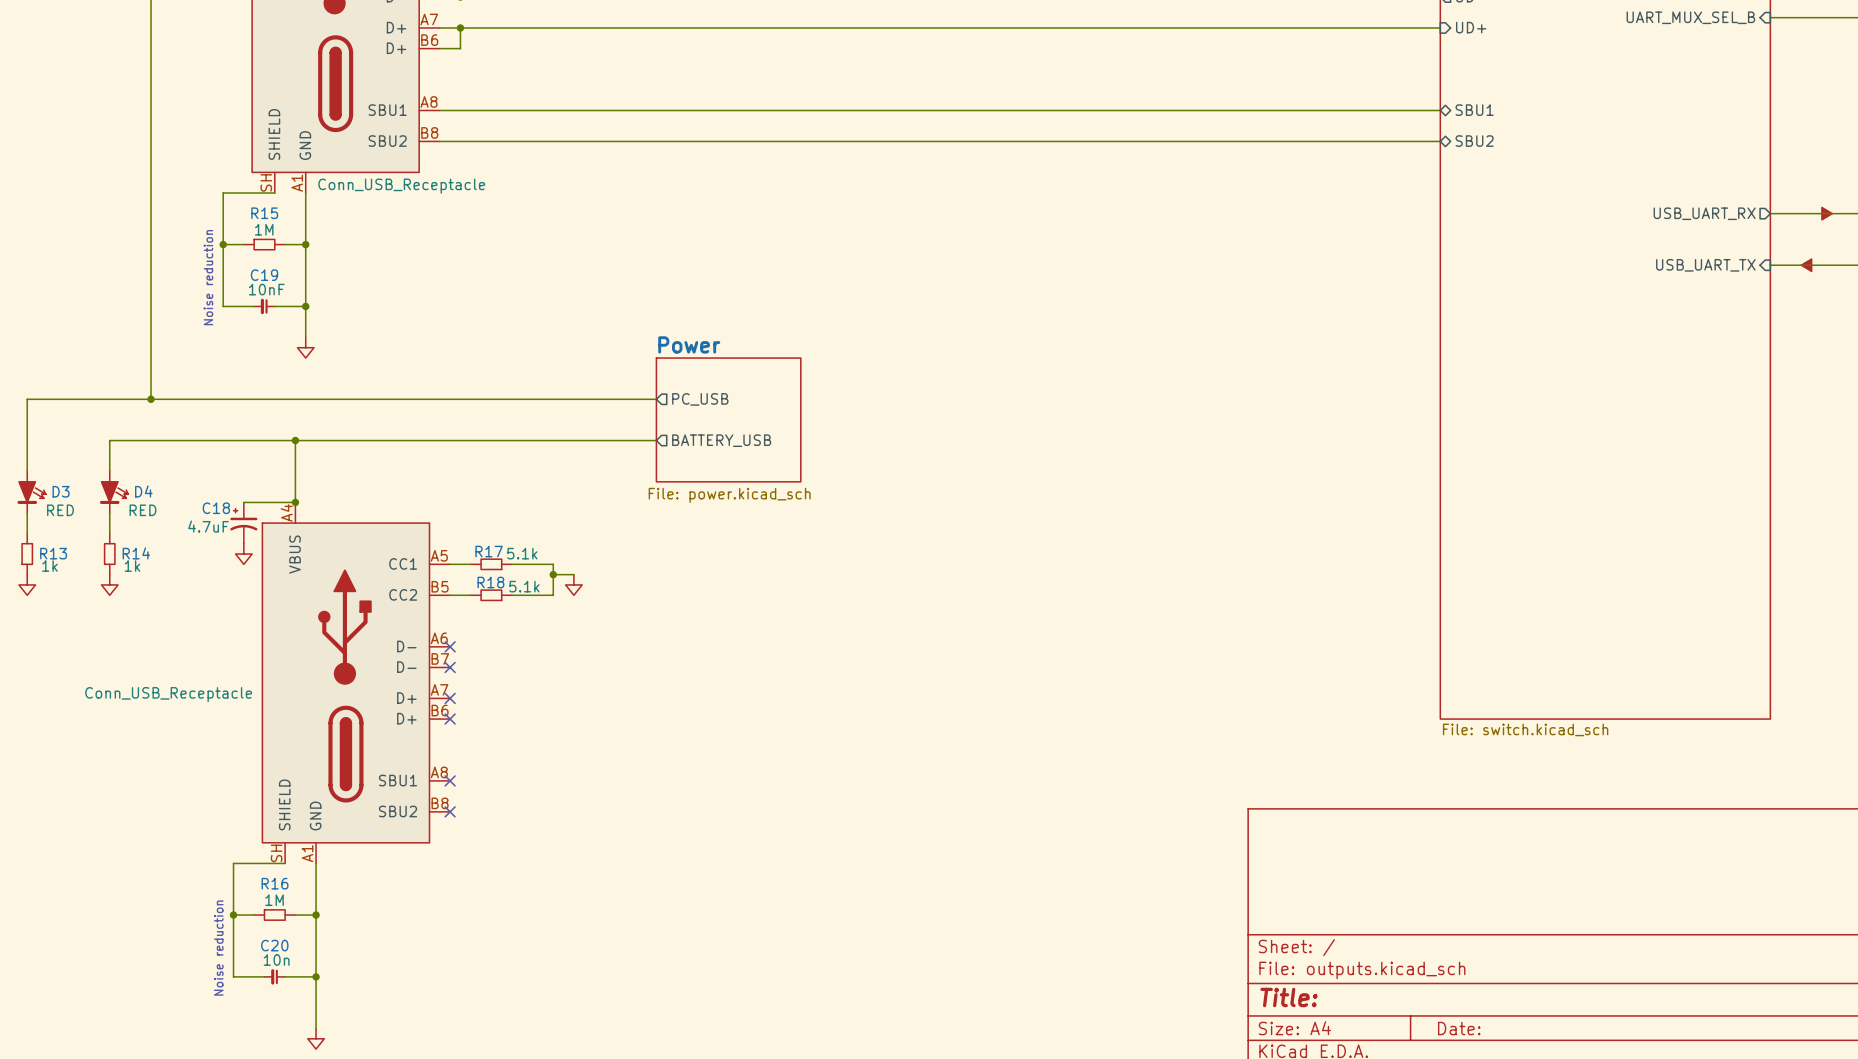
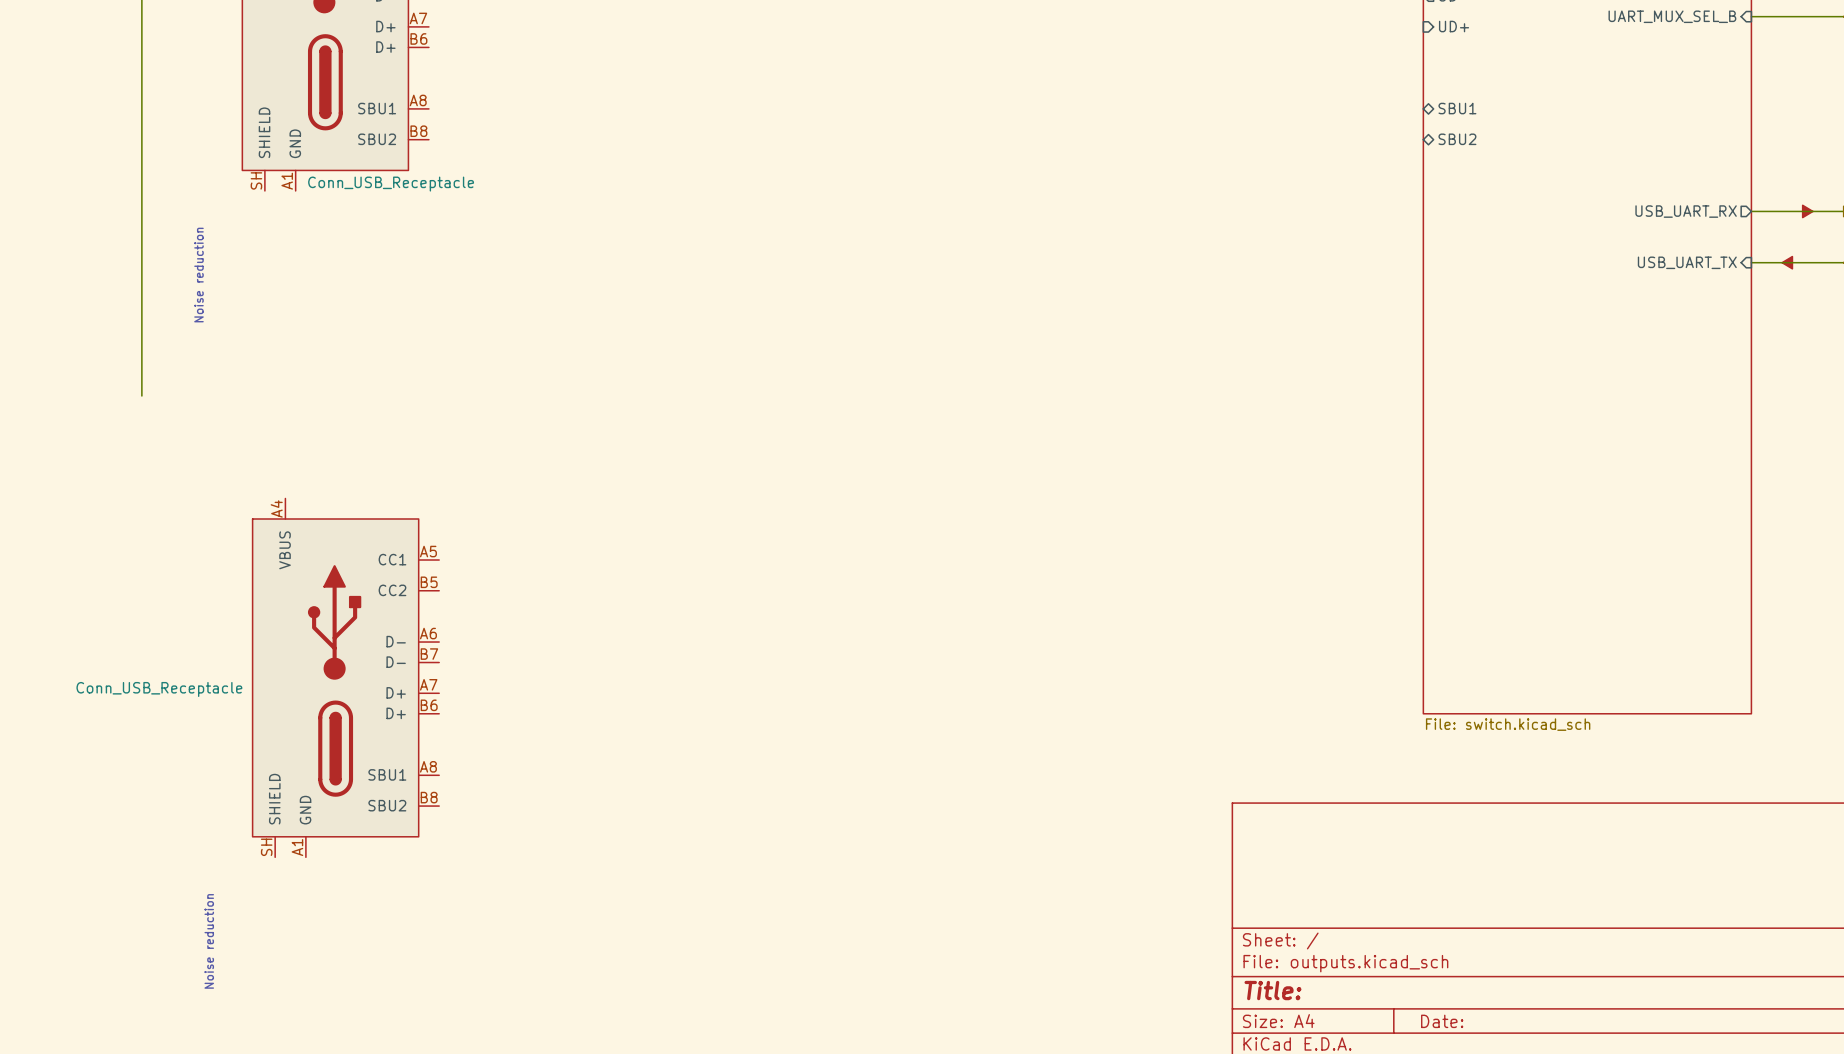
wire: (439, 27) (1440, 27) -> none
wire: (460, 27) (460, 48) (439, 48) -> none
junction: (460, 27) -> none
wire: (439, 110) (1440, 110) -> none
wire: (439, 141) (1440, 141) -> none
wire: (274, 193) (223, 193) (223, 306) (254, 306) -> none
wire: (305, 193) (305, 337) -> none
wire: (223, 244) (243, 244) -> none
junction: (223, 244) -> none
R15: 1M (264, 244) -> none
wire: (285, 244) (305, 244) -> none
junction: (305, 244) -> none
C19: 10nF (264, 306) -> none
wire: (274, 306) (305, 306) -> none
junction: (305, 306) -> none
power symbol: (305, 347) -> none
junction: (151, 399) -> none
wire: (656, 399) (27, 399) (27, 471) -> none
sheet pin: PC_USB (700, 399) -> none
sheet Power: File: power.kicad_sch (728, 419) -> none
wire: (295, 440) (295, 502) (243, 502) -> none
junction: (295, 440) -> none
wire: (656, 440) (109, 440) (109, 471) -> none
sheet pin: BATTERY_USB (721, 440) -> none
D3: RED (31, 492) -> none
D4: RED (114, 492) -> none
junction: (295, 502) -> none
wire: (27, 512) (27, 533) -> none
wire: (109, 512) (109, 533) -> none
C18: 4.7uF (243, 523) -> none
R13: 1k (27, 554) -> none
R14: 1k (109, 554) -> none
power symbol: (243, 554) -> none
wire: (450, 564) (470, 564) -> none
R17: 5.1k (491, 564) -> none
wire: (512, 564) (553, 564) (553, 595) (512, 595) -> none
wire: (553, 574) (573, 574) -> none
junction: (553, 574) -> none
power symbol: (27, 584) -> none
power symbol: (109, 584) -> none
power symbol: (573, 584) -> none
wire: (450, 595) (470, 595) -> none
R18: 5.1k (491, 595) -> none
no-connect mark: (450, 646) -> none
no-connect mark: (450, 667) -> none
no-connect mark: (450, 698) -> none
no-connect mark: (450, 719) -> none
no-connect mark: (450, 780) -> none
no-connect mark: (450, 811) -> none
wire: (285, 863) (233, 863) (233, 976) (264, 976) -> none
wire: (316, 863) (316, 1028) -> none
wire: (233, 915) (254, 915) -> none
junction: (233, 915) -> none
R16: 1M (274, 915) -> none
wire: (295, 915) (316, 915) -> none
junction: (316, 915) -> none
C20: 10n (274, 976) -> none
wire: (285, 976) (316, 976) -> none
junction: (316, 976) -> none
power symbol: (316, 1038) -> none

